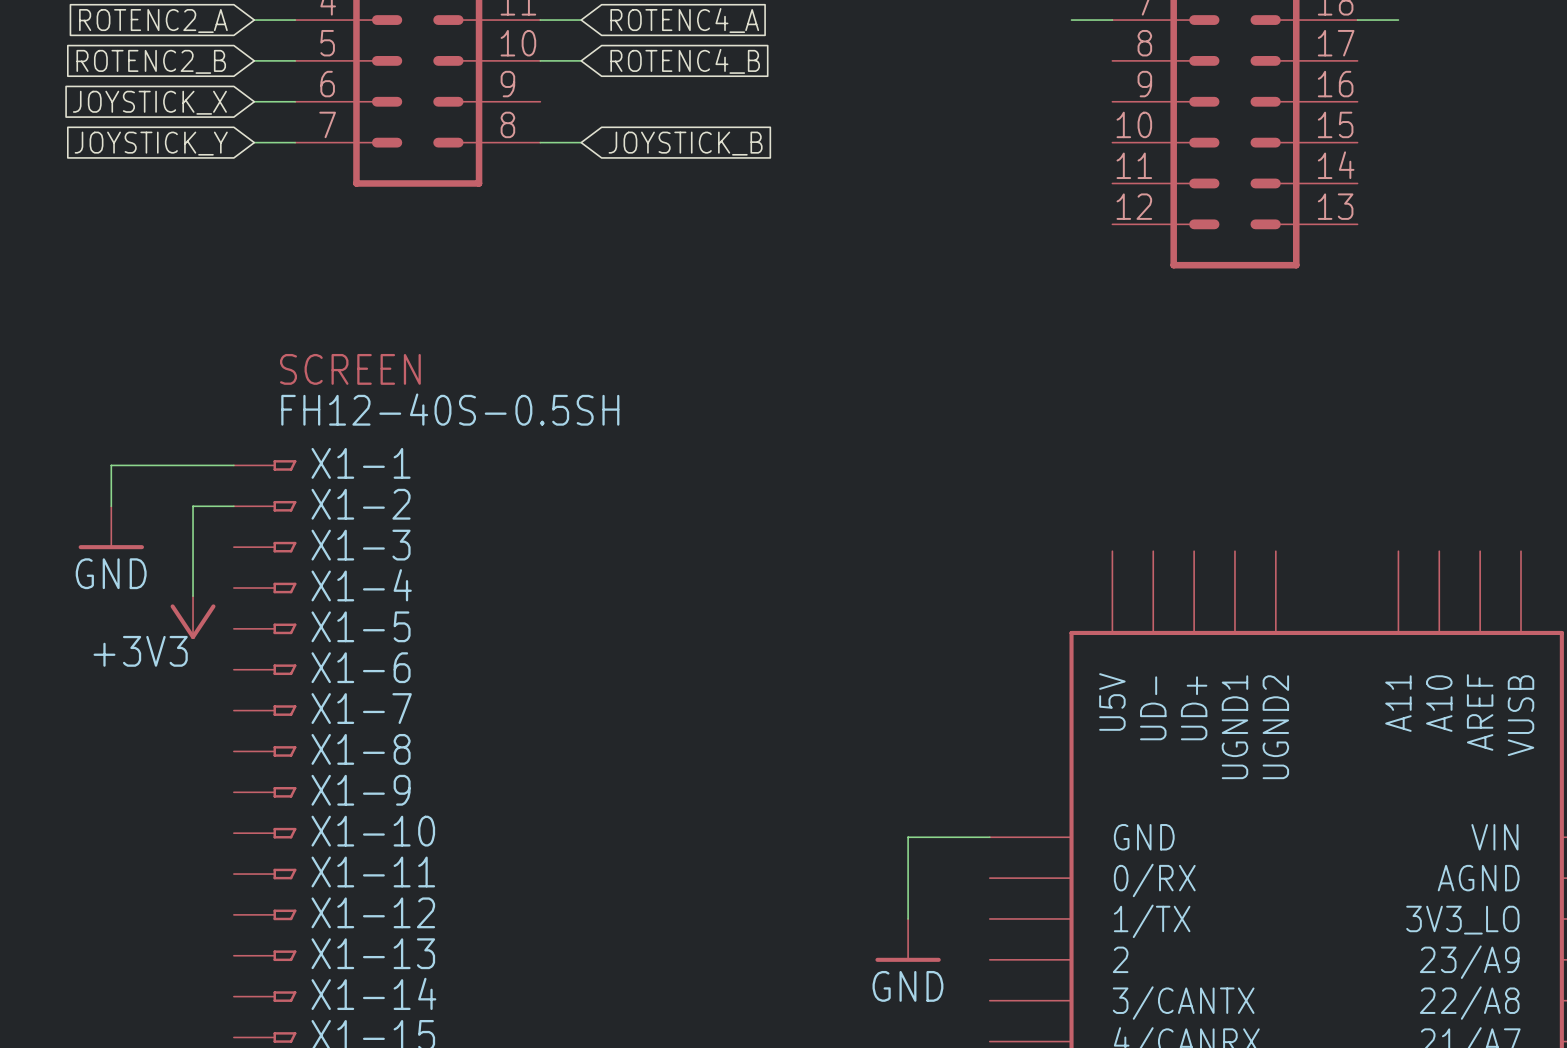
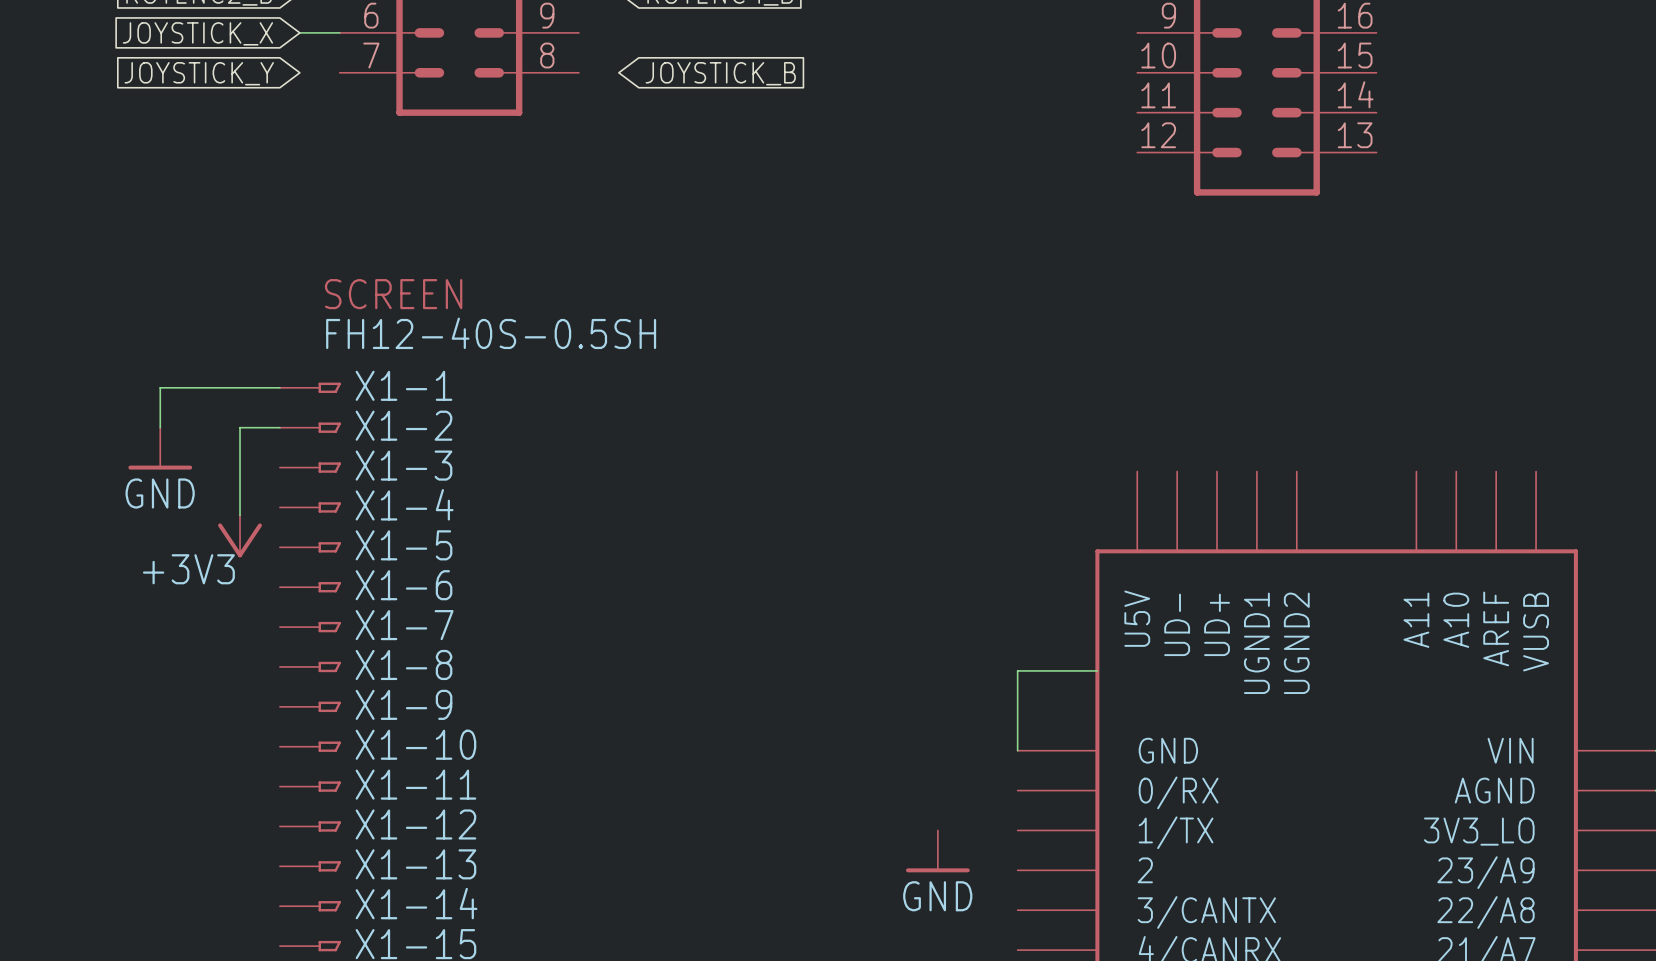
wire: (254, 142) (295, 142) -> none
wire: (540, 142) (581, 142) -> none
wire: (989, 837) (908, 837) (908, 918) -> (1017, 750) (1017, 670) (1097, 670)

